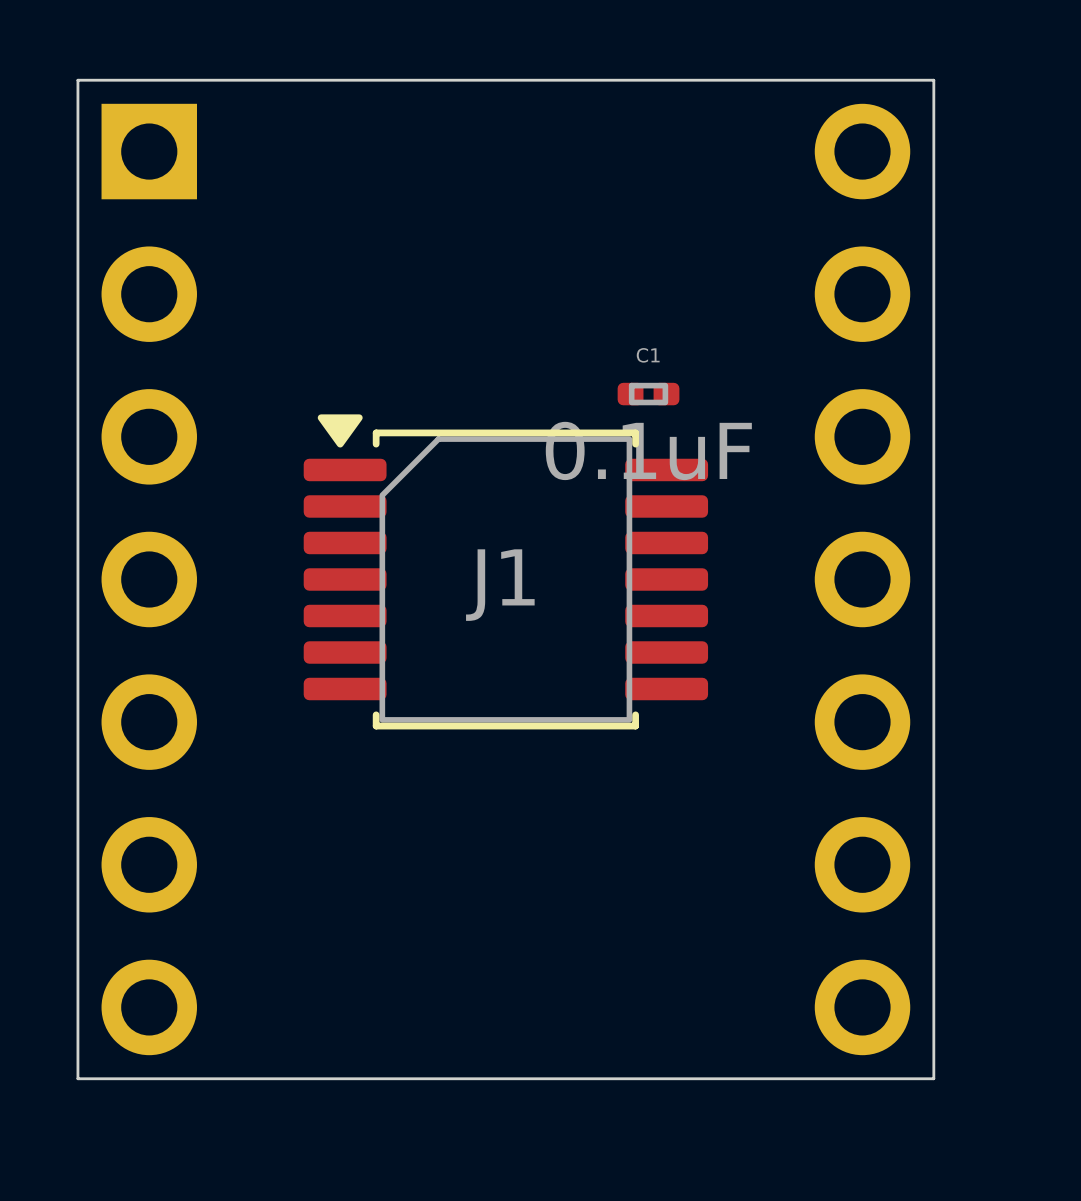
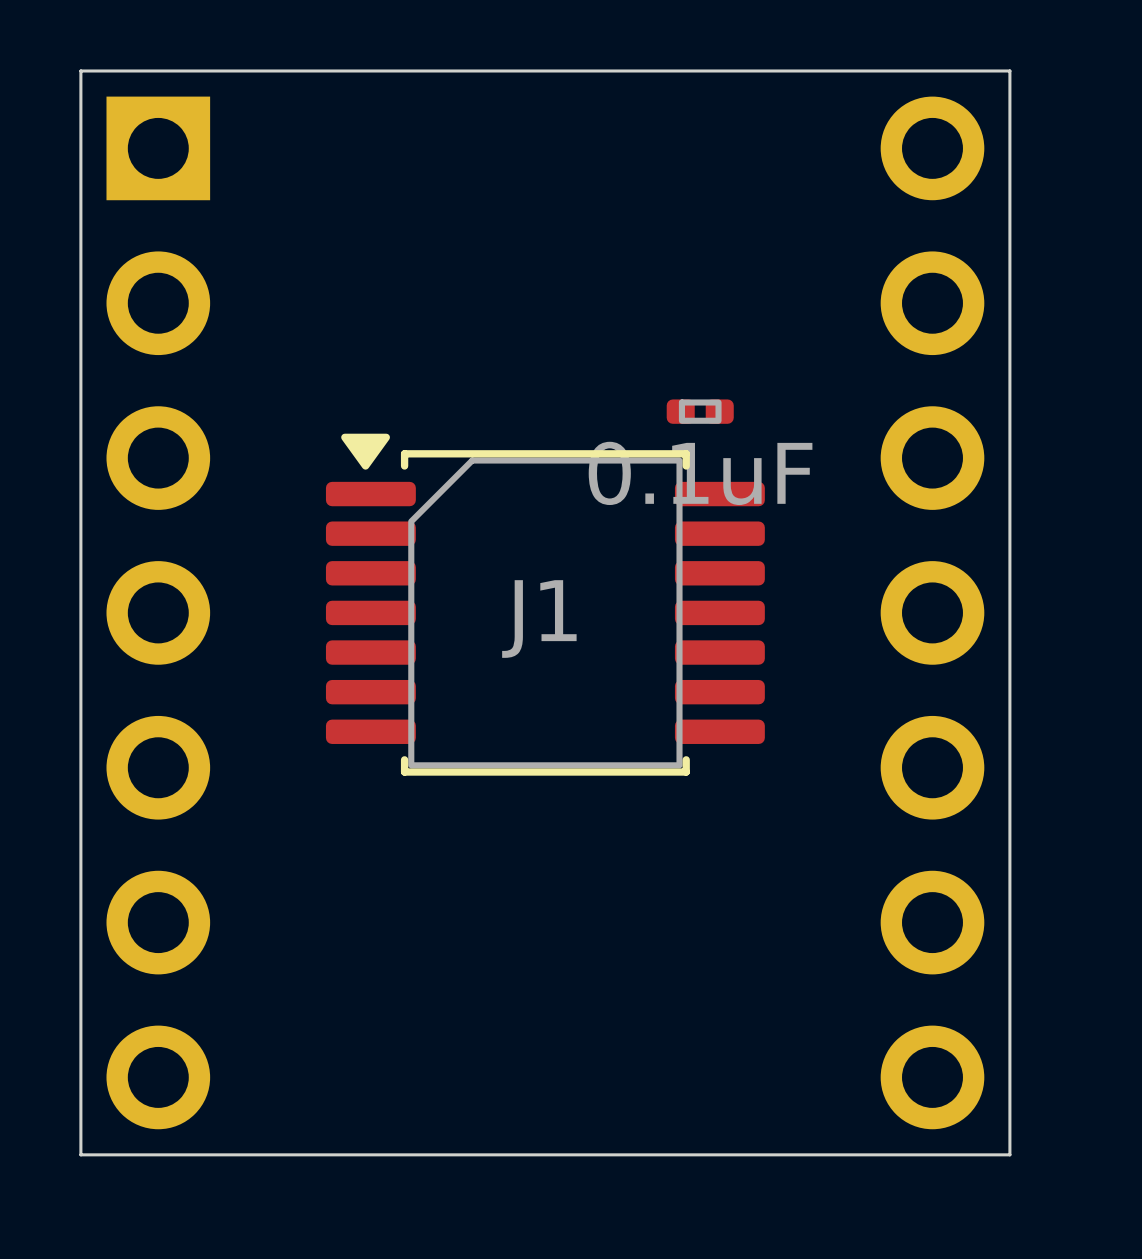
C1 name: C1 (648, 355) -> none

